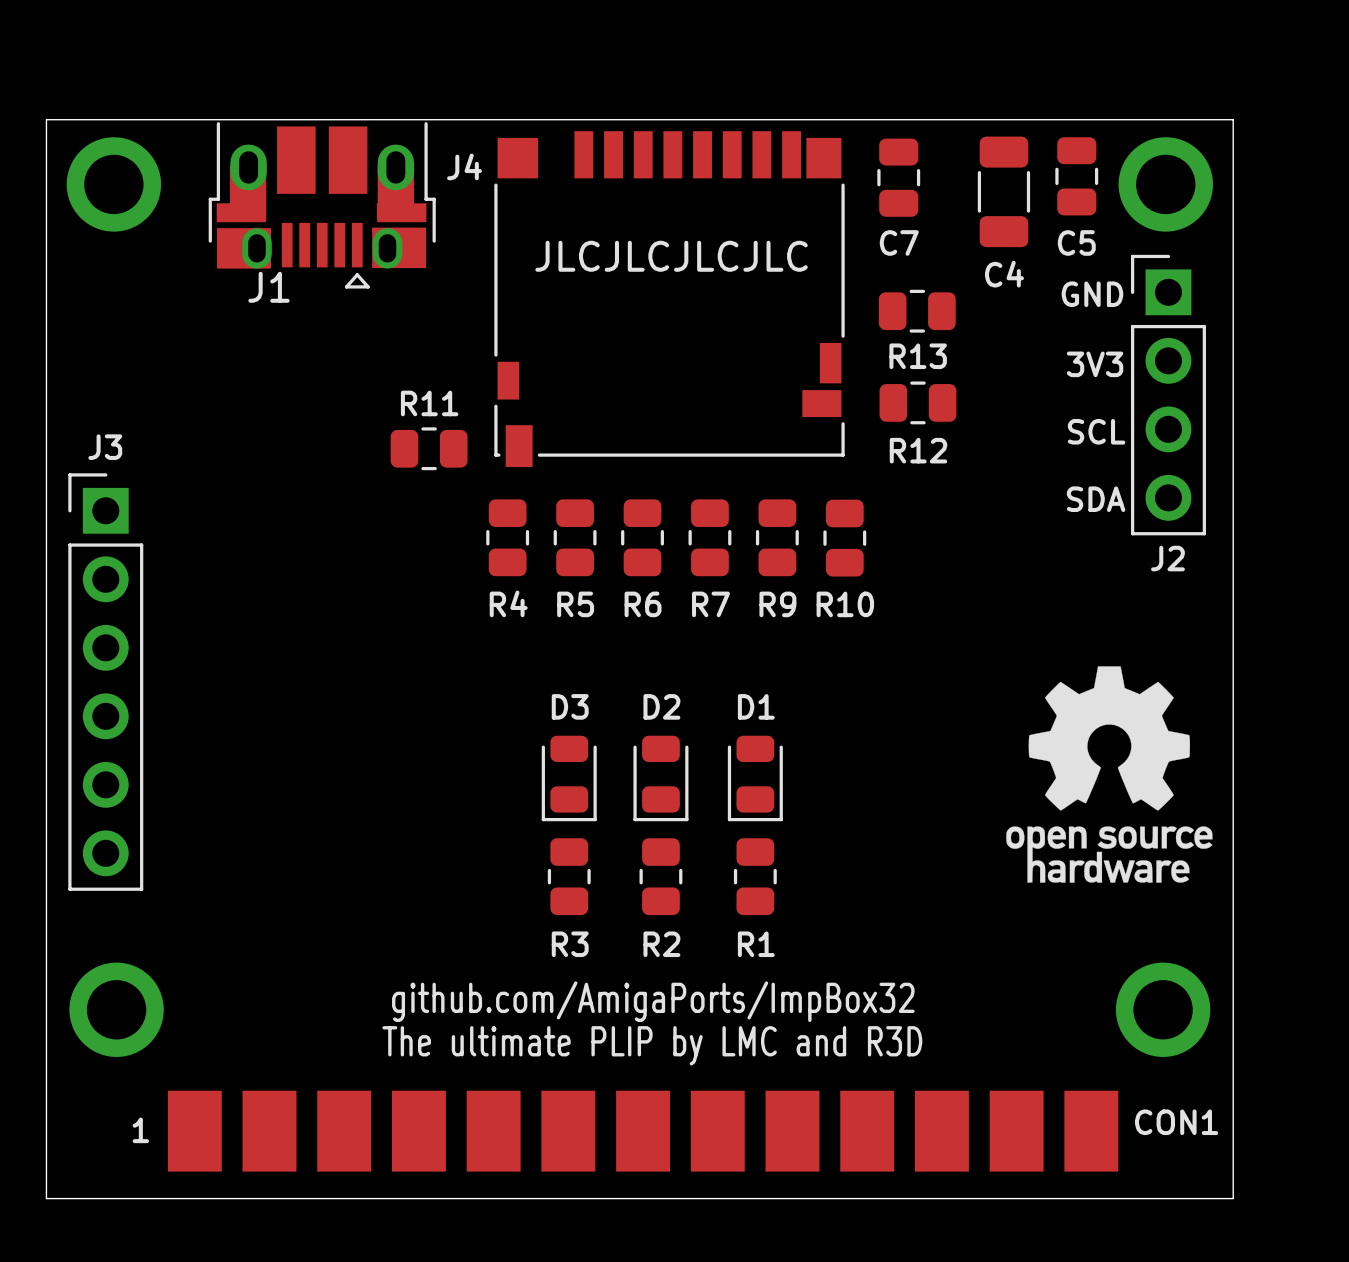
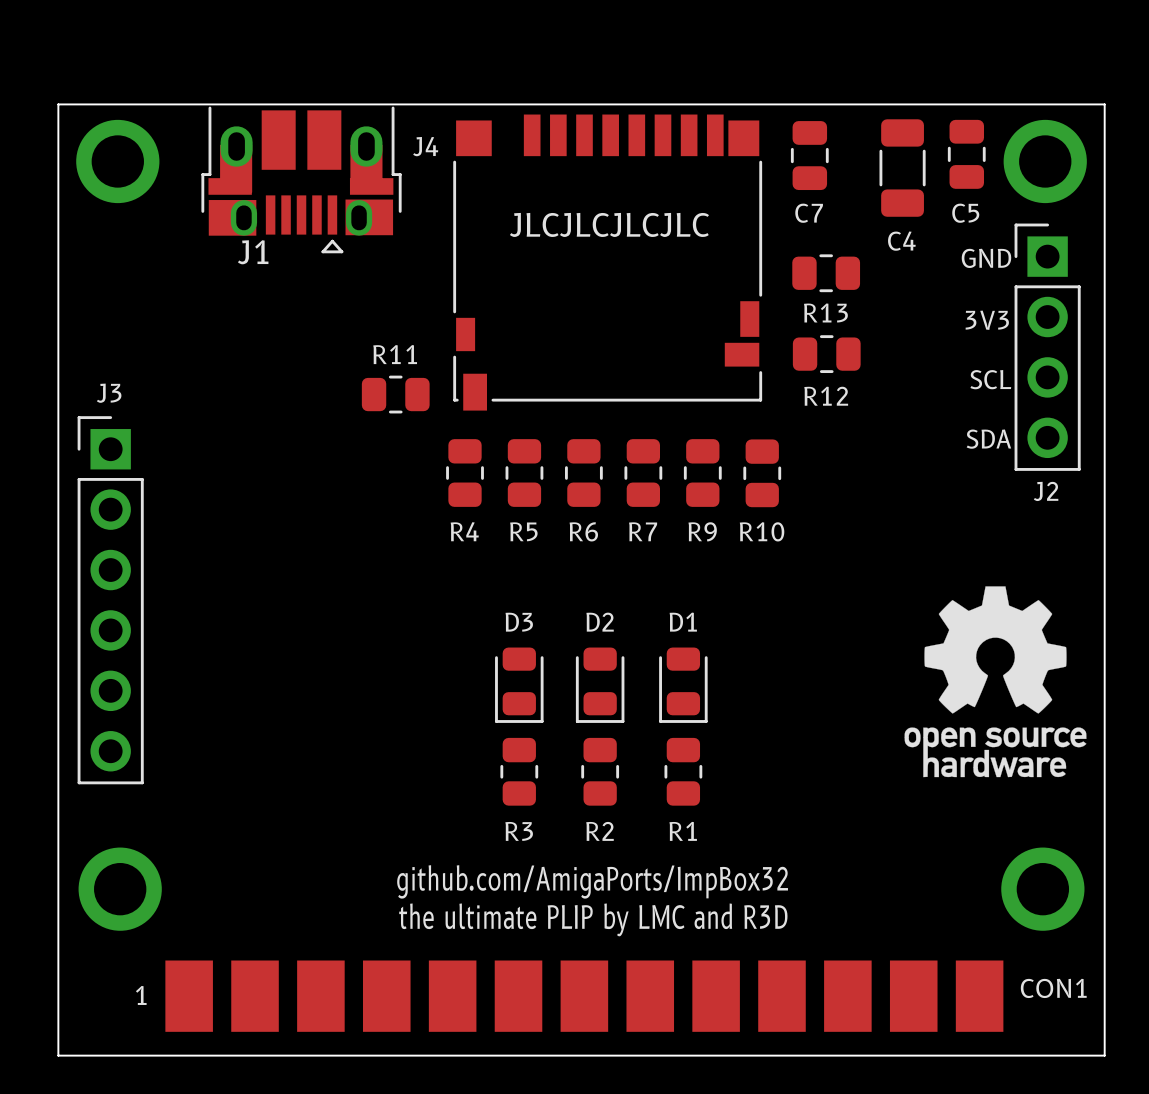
text: The ultimate PLIP by LMC and R3D (652, 1045) -> the ultimate PLIP by LMC and R3D (593, 919)

